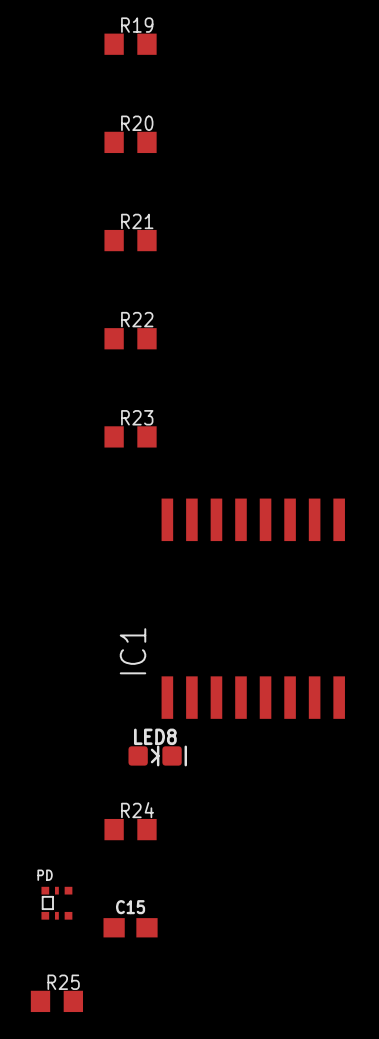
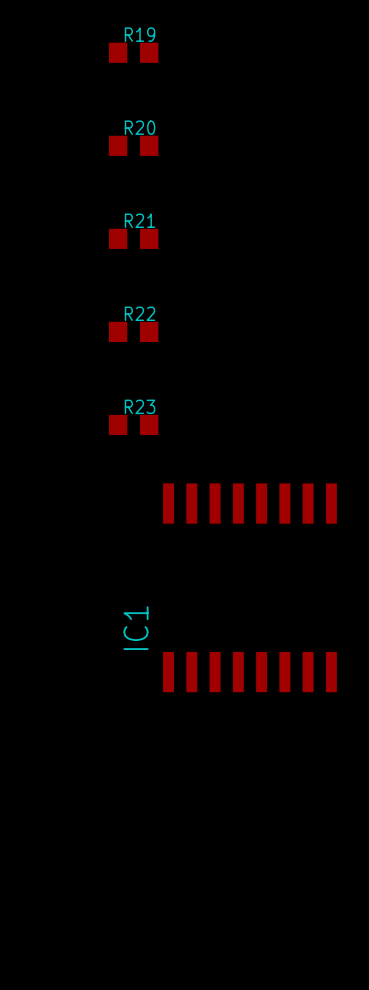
LED8: (157, 755) -> none
R24: (130, 829) -> none
PD: (56, 903) -> none
C15: (130, 927) -> none
R25: (56, 1001) -> none

